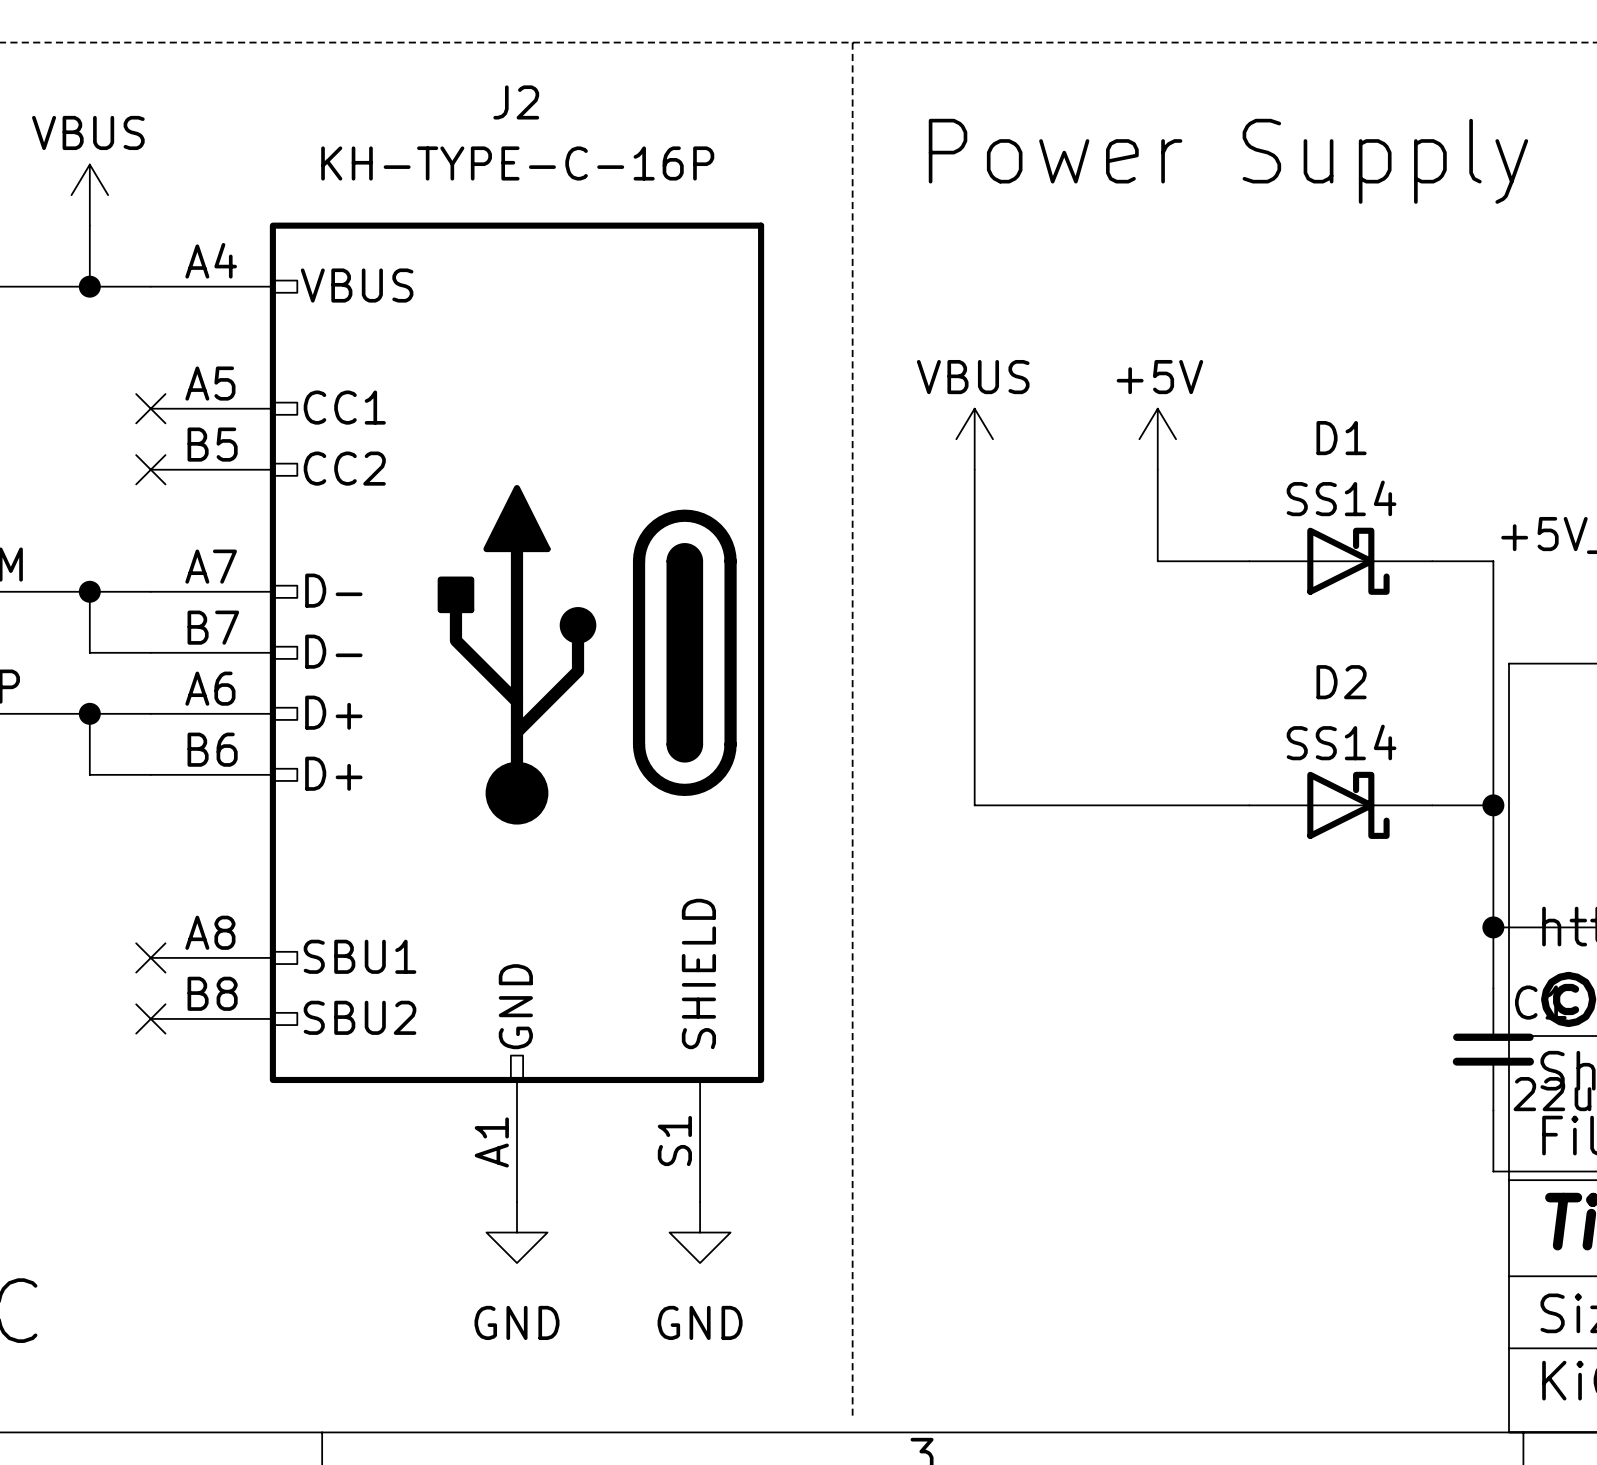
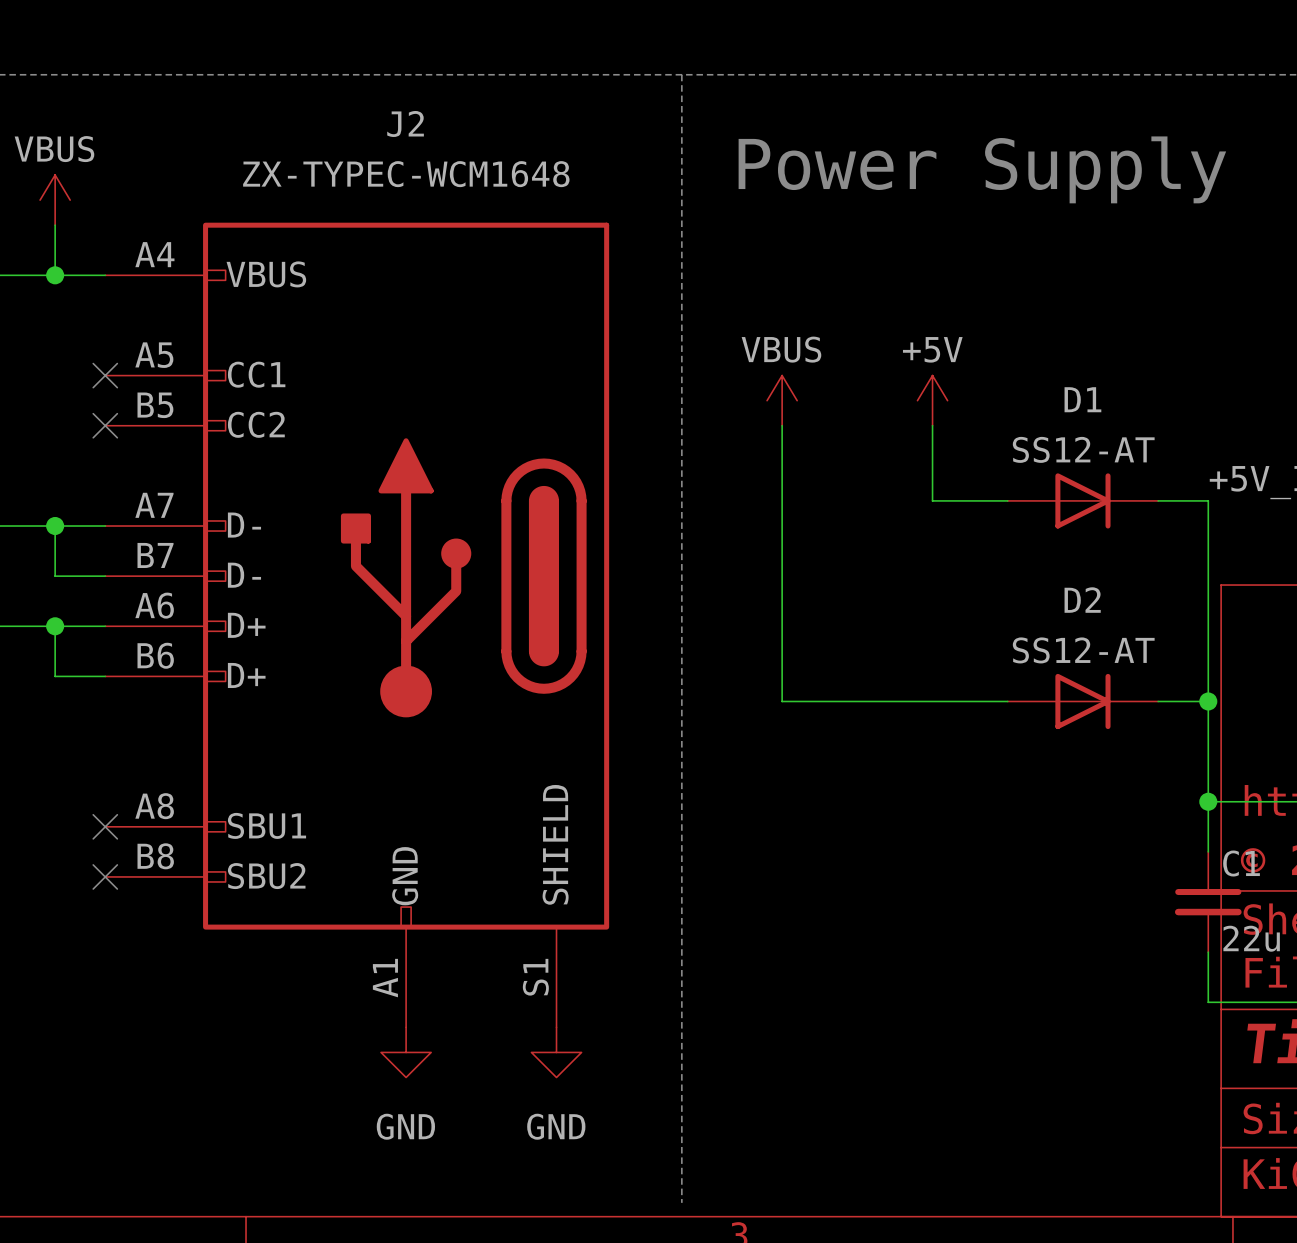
J2 value: KH-TYPE-C-16P (517, 163) -> ZX-TYPEC-WCM1648 (406, 174)
D1 value: SS14 (1341, 498) -> SS12-AT (1083, 449)
D1 symbol: [1249, 527, 1433, 595] -> [1007, 473, 1159, 529]
D2 value: SS14 (1341, 742) -> SS12-AT (1083, 650)
D2 symbol: [1249, 771, 1433, 839] -> [1007, 673, 1159, 730]

